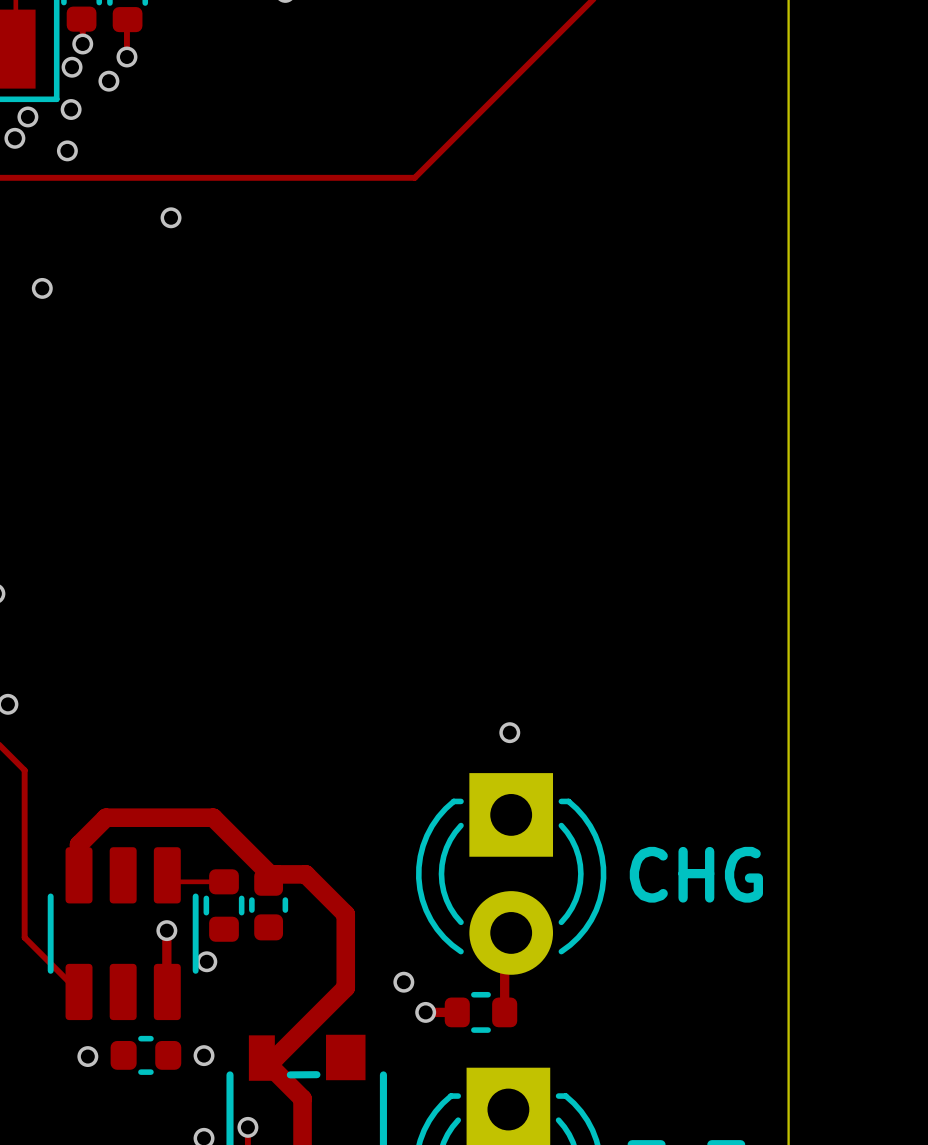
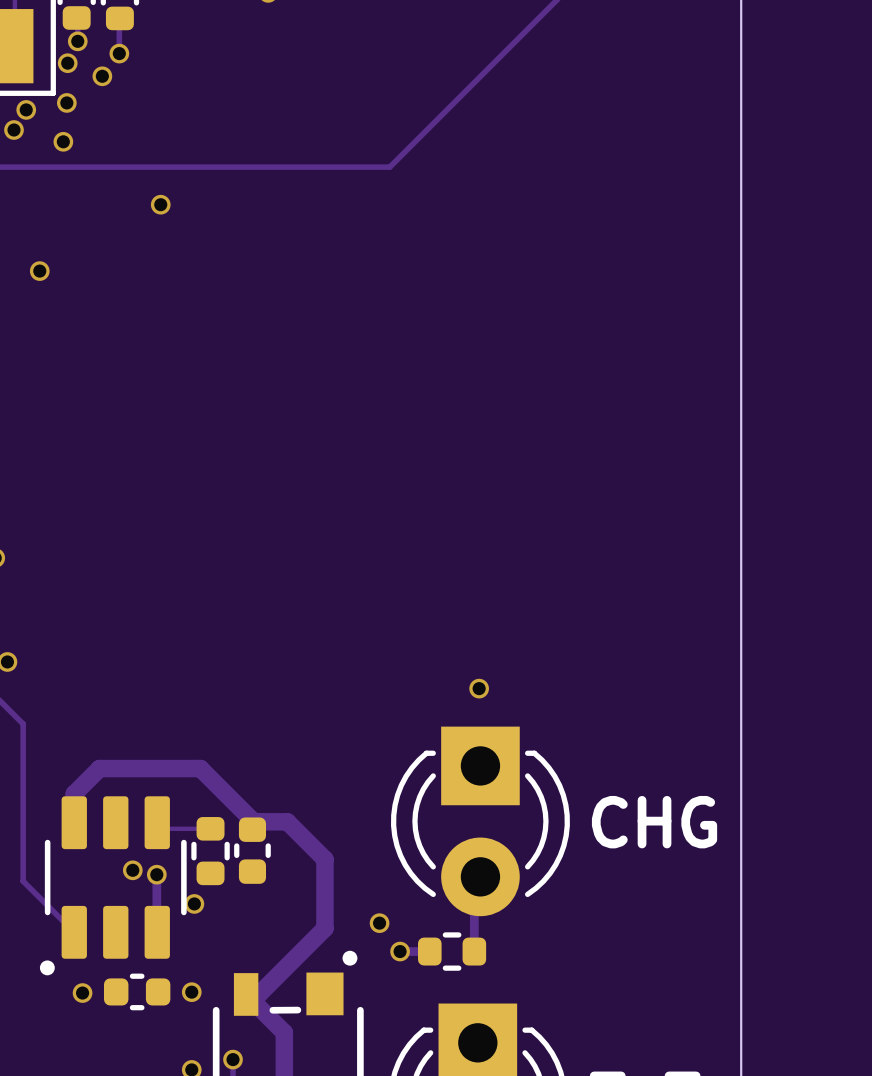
via: none -> (132, 870)
drawing: none -> [342, 950, 358, 966]
drawing: none -> [39, 960, 55, 976]

